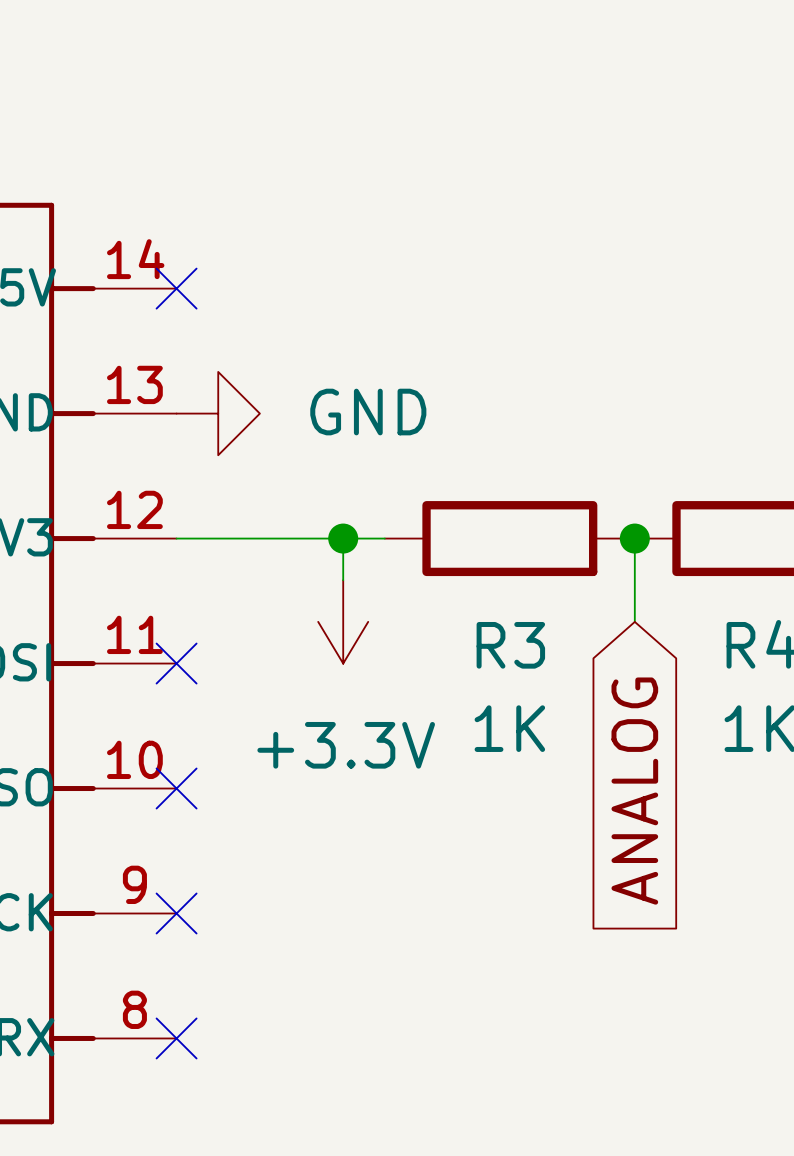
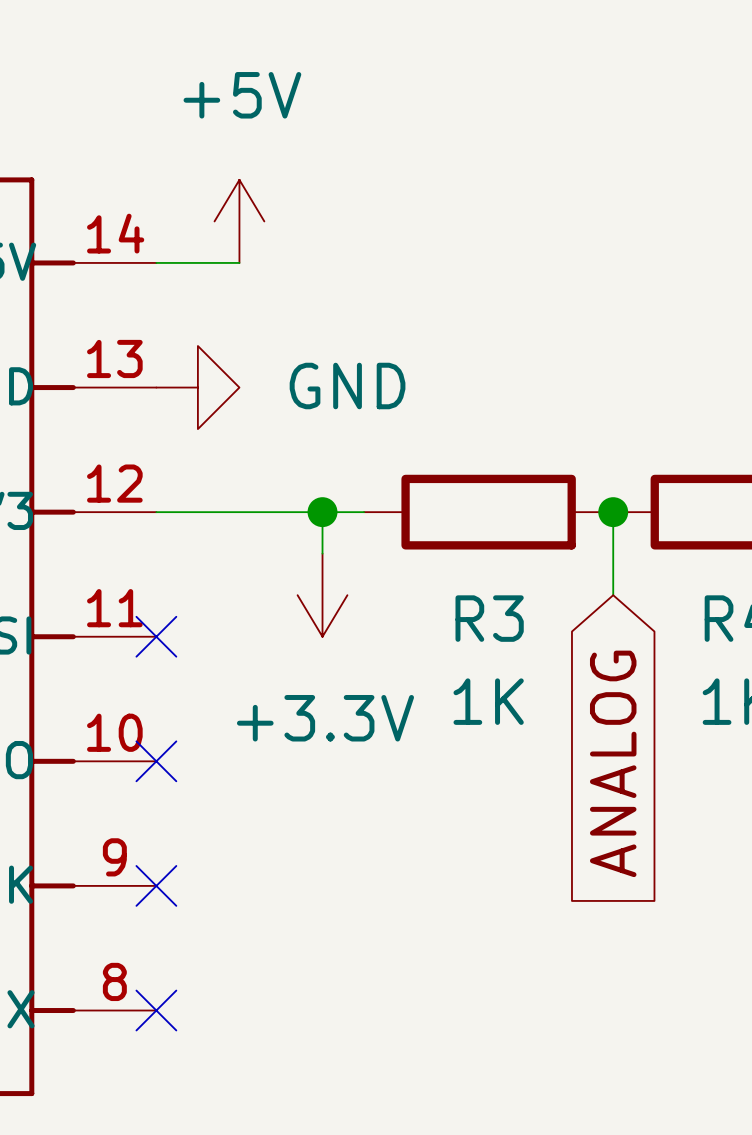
power symbol: none -> +5V (239, 221)
wire: none -> (156, 262) (239, 262)
no-connect mark: (176, 288) -> none

